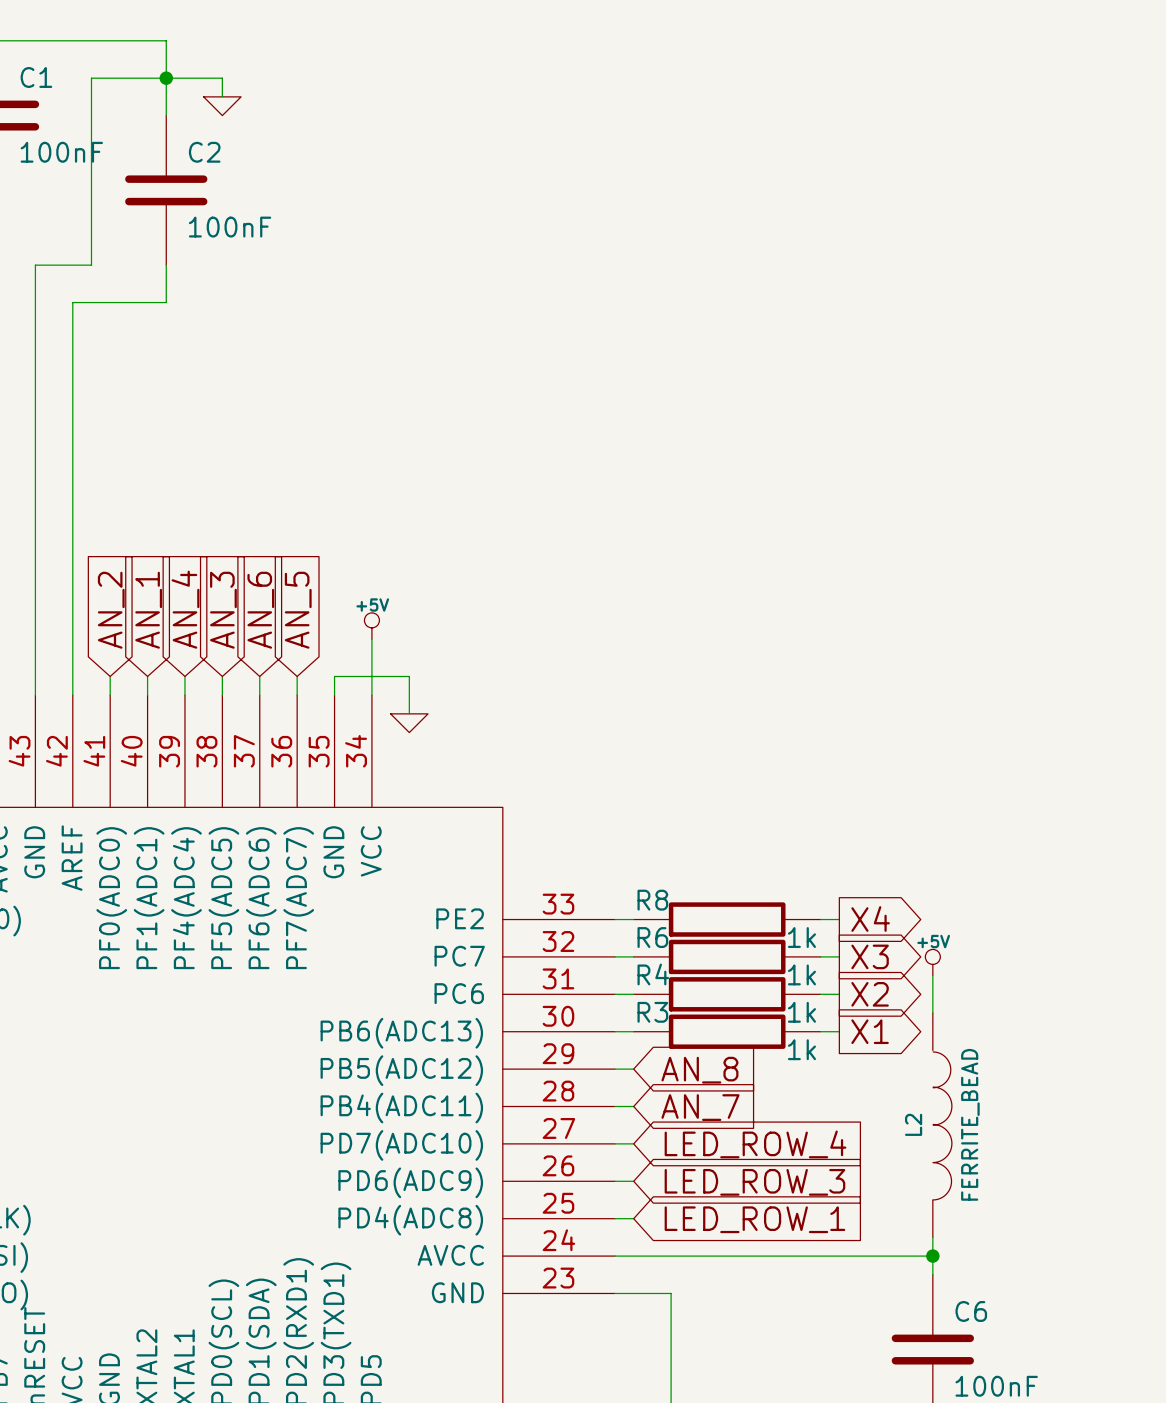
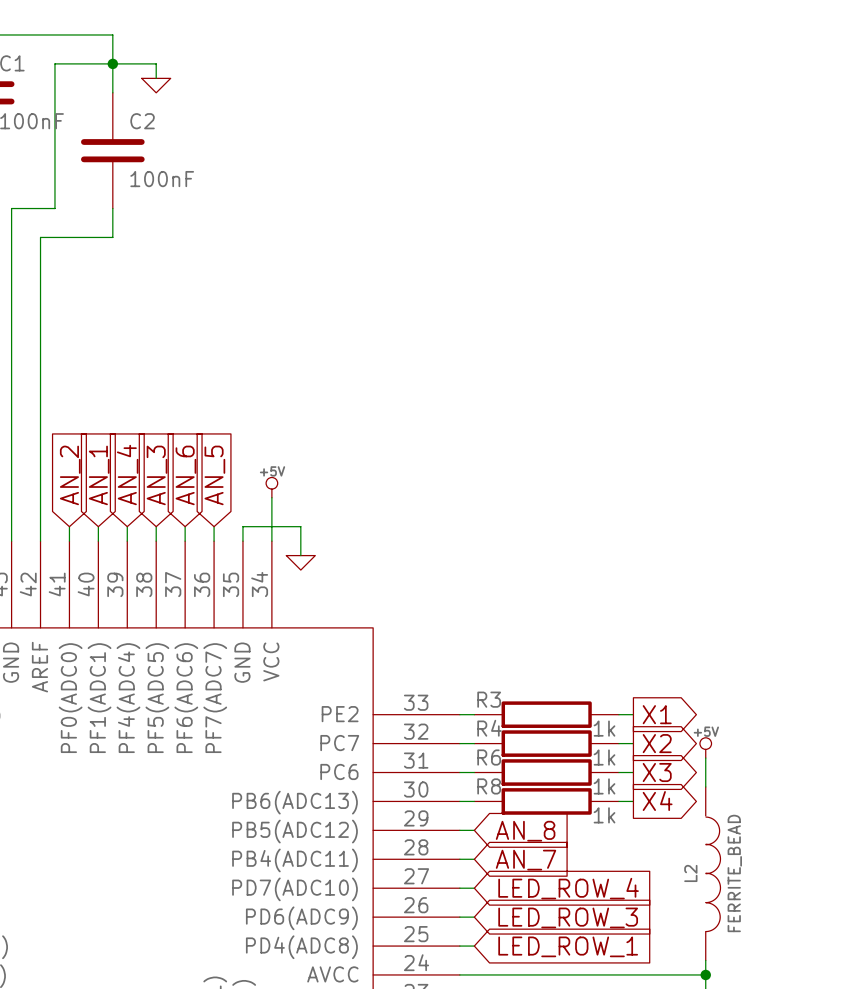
R8 name: R8 (652, 900) -> R3 (489, 699)
global label: X4 (870, 919) -> X1 (657, 714)
R6 name: R6 (652, 937) -> R4 (489, 728)
global label: X3 (870, 956) -> X2 (657, 743)
R4 name: R4 (653, 974) -> R6 (489, 757)
global label: X2 (870, 994) -> X3 (657, 772)
R3 name: R3 (652, 1012) -> R8 (489, 786)
global label: X1 (870, 1031) -> X4 (657, 801)

